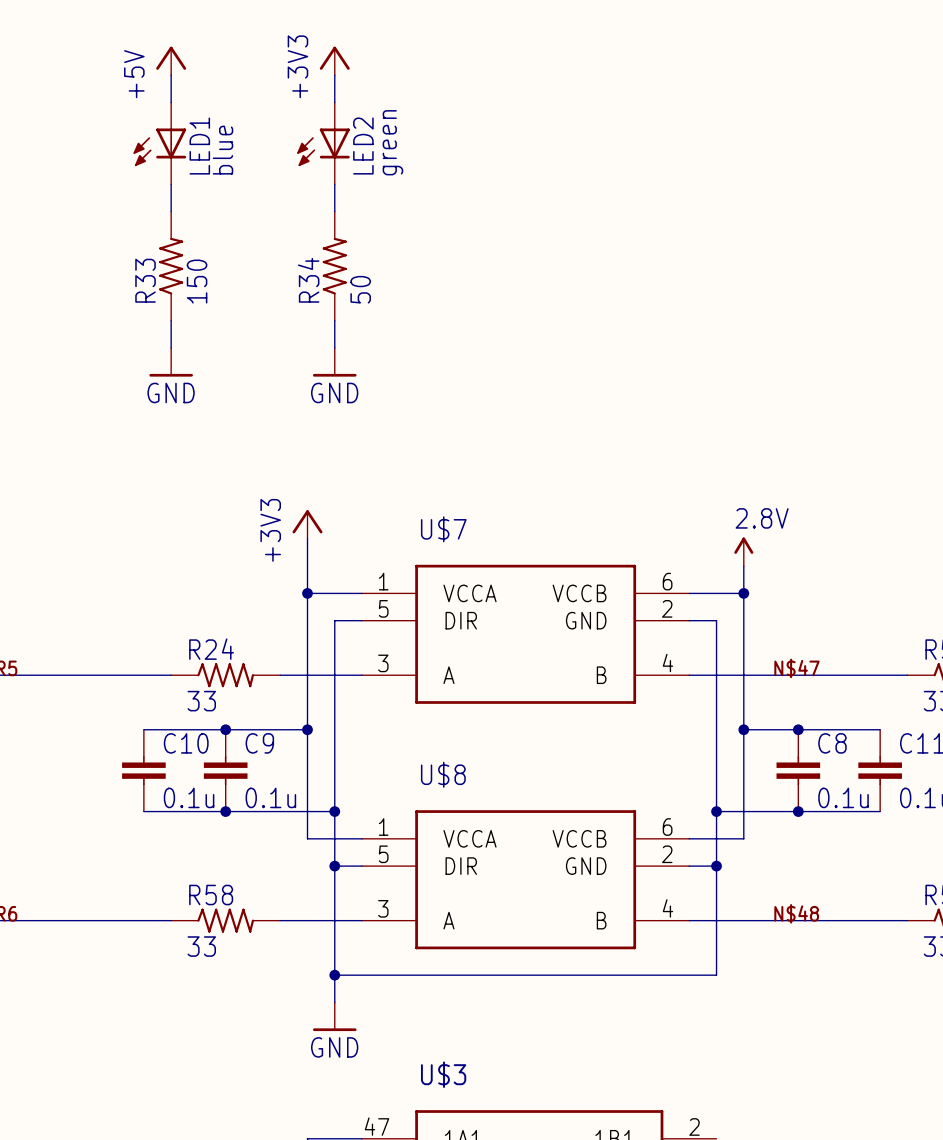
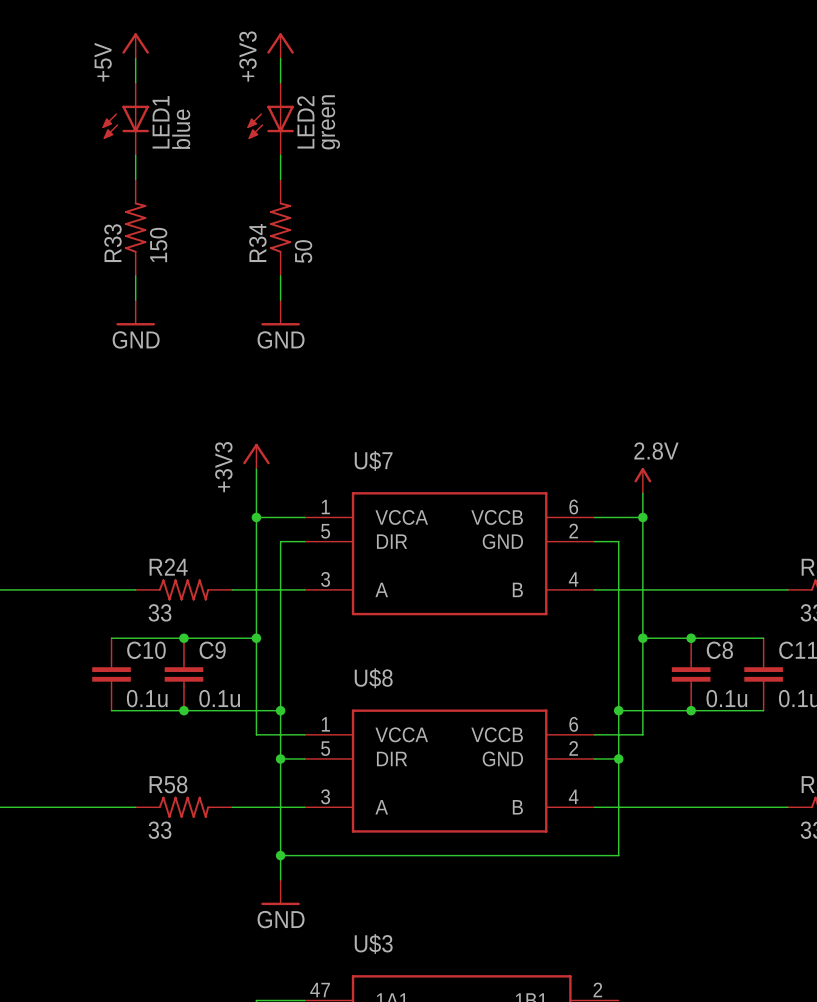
label: N$47 (796, 668) -> none
label: N$48 (796, 913) -> none

